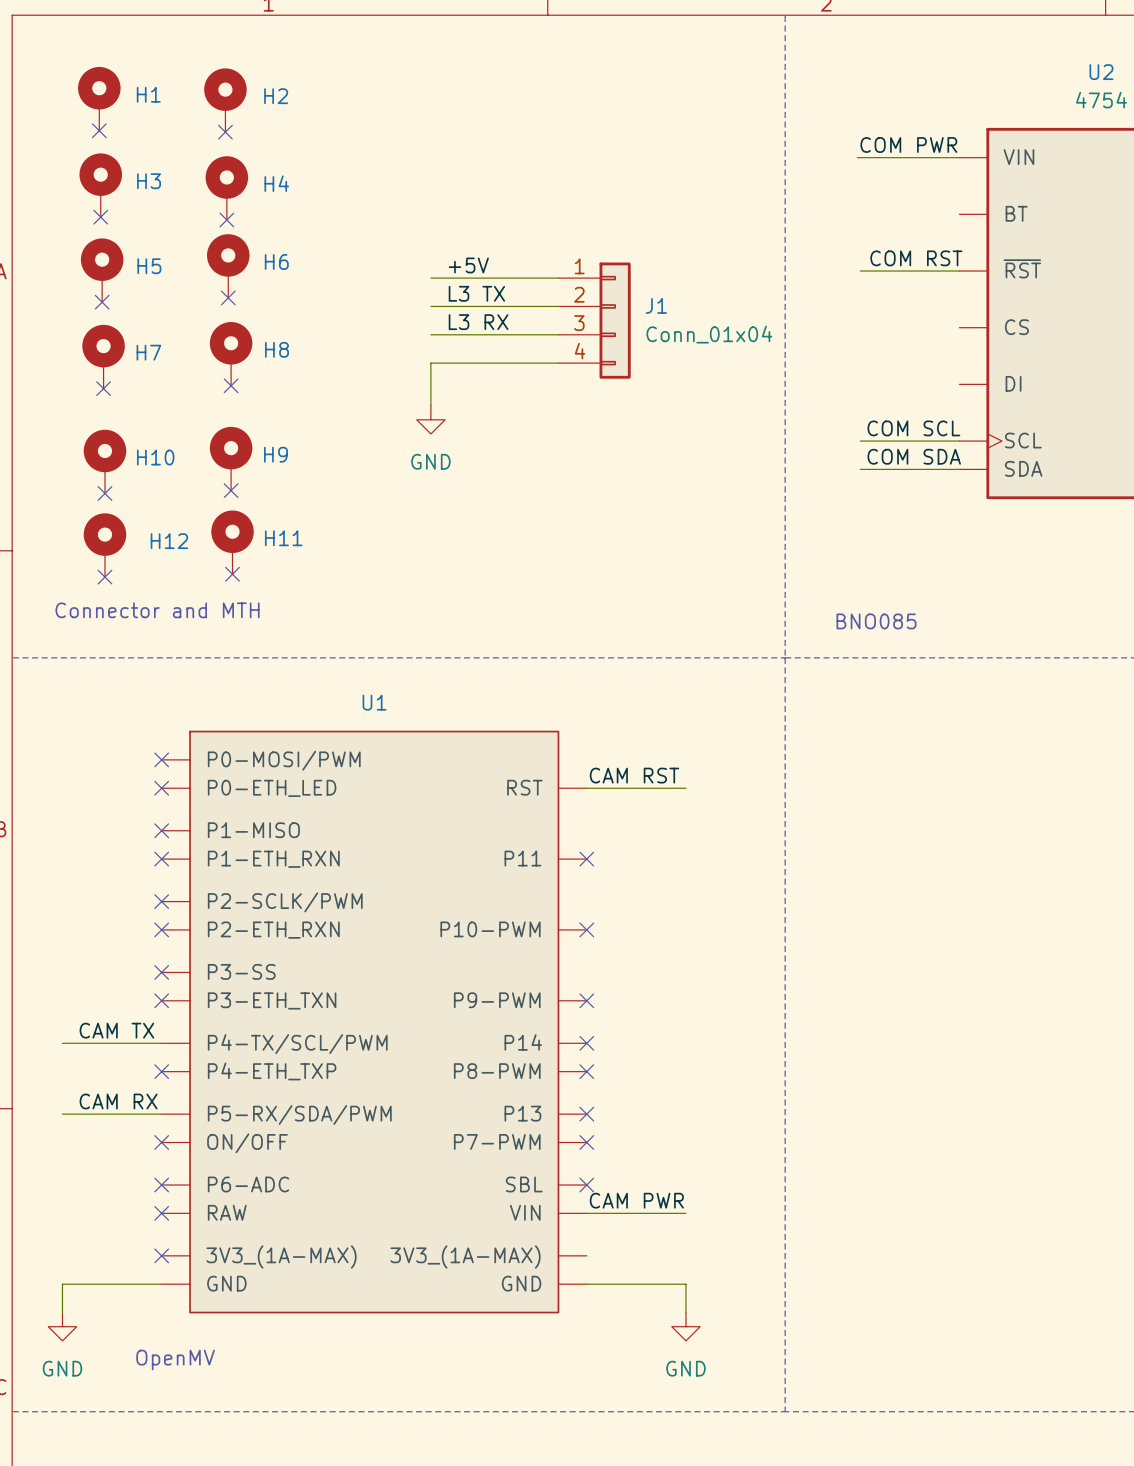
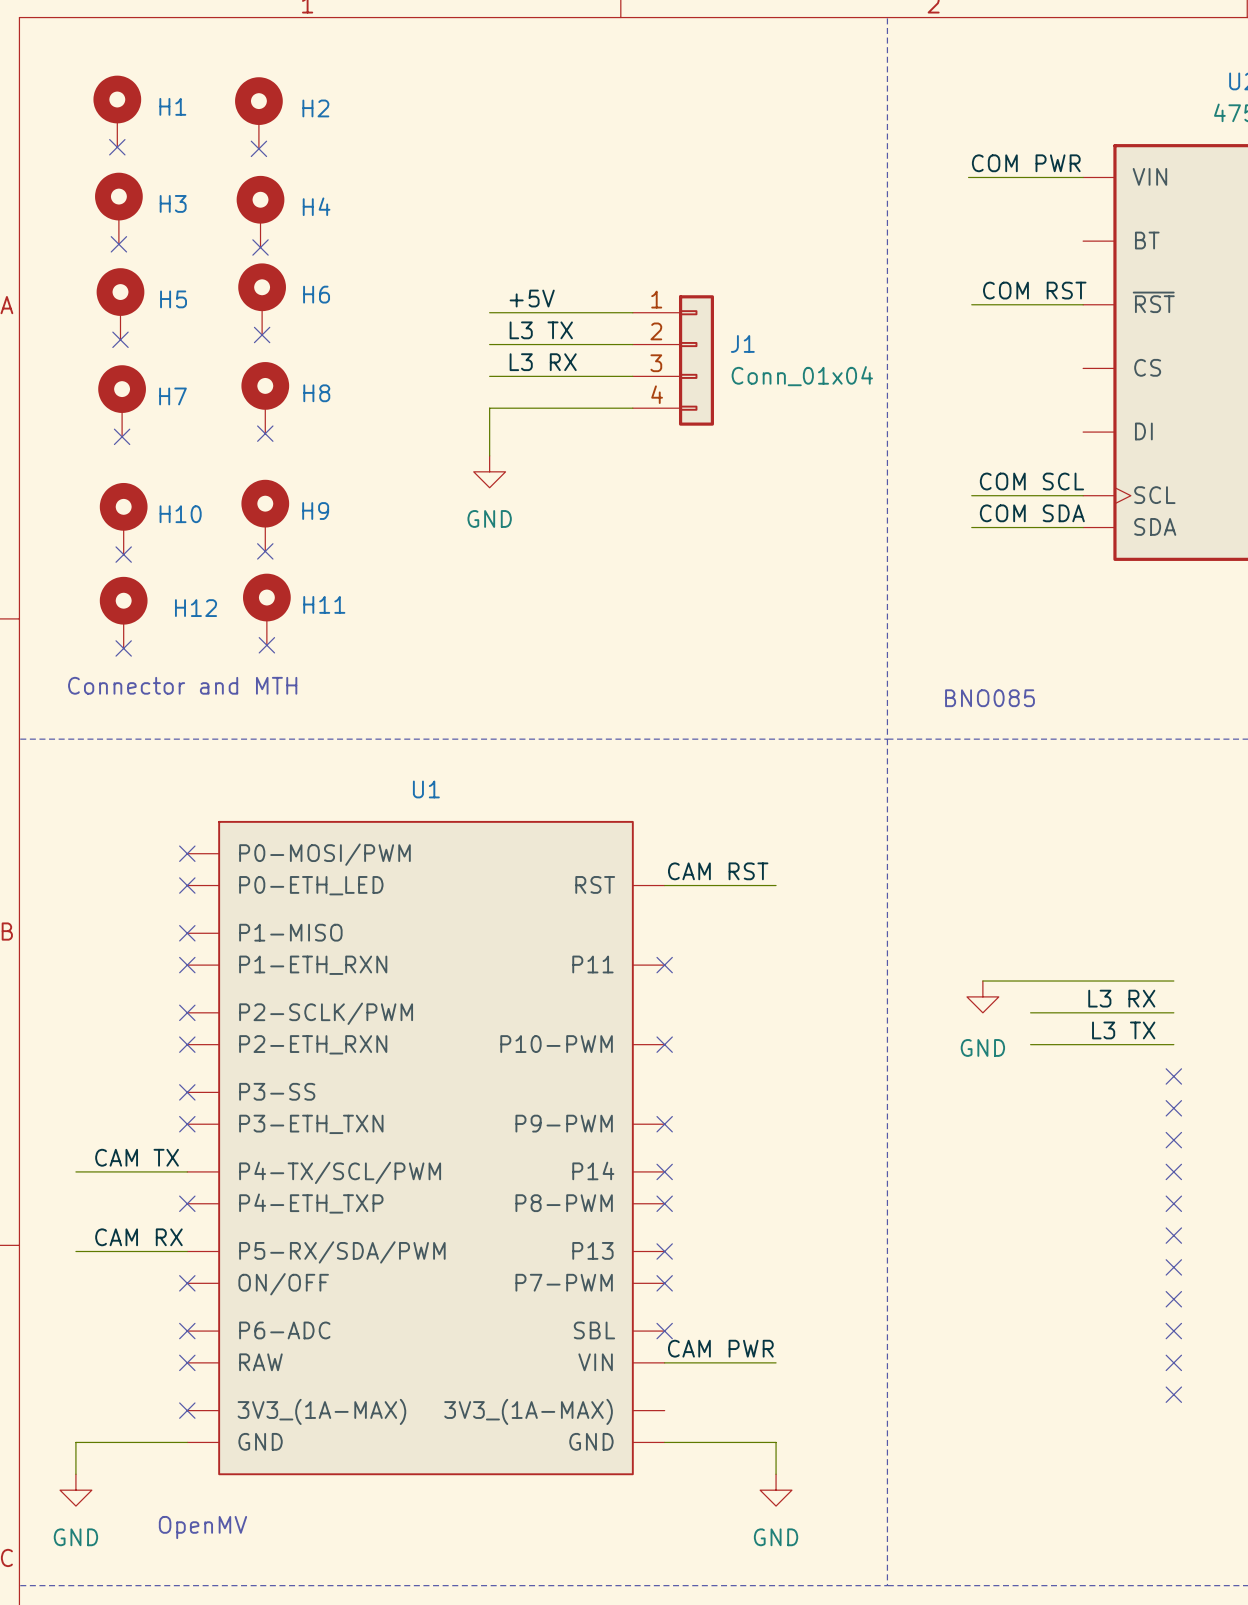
wire: none -> (982, 981) (1173, 981)
power symbol: none -> GND (982, 996)
label: none -> L3 RX (1121, 998)
wire: none -> (1030, 1012) (1173, 1012)
label: none -> L3 TX (1123, 1030)
wire: none -> (1030, 1044) (1173, 1044)
no-connect mark: none -> (1173, 1076)
no-connect mark: none -> (1173, 1108)
no-connect mark: none -> (1173, 1140)
no-connect mark: none -> (1173, 1171)
no-connect mark: none -> (1173, 1203)
no-connect mark: none -> (1173, 1235)
no-connect mark: none -> (1173, 1267)
no-connect mark: none -> (1173, 1299)
no-connect mark: none -> (1173, 1331)
no-connect mark: none -> (1173, 1362)
no-connect mark: none -> (1173, 1394)

